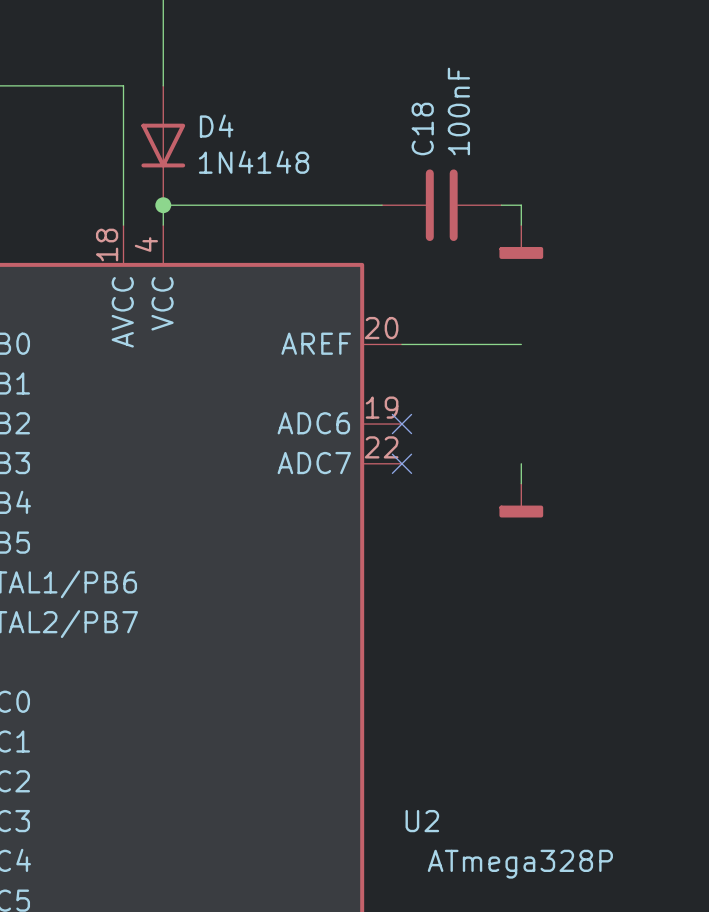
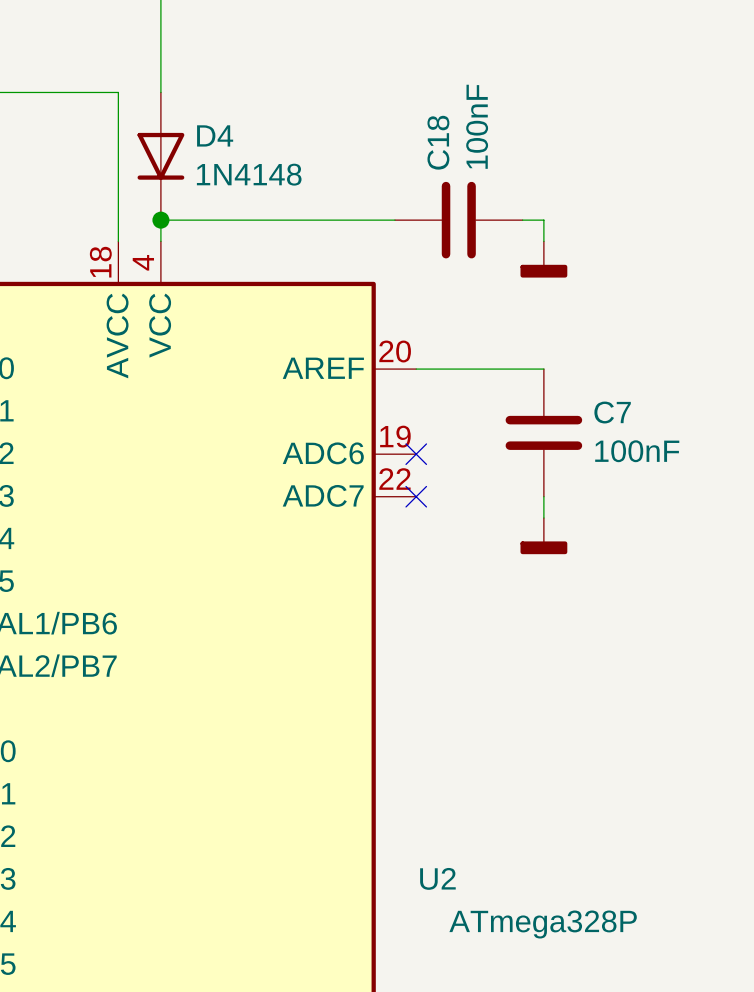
C7: none -> 100nF (543, 432)

